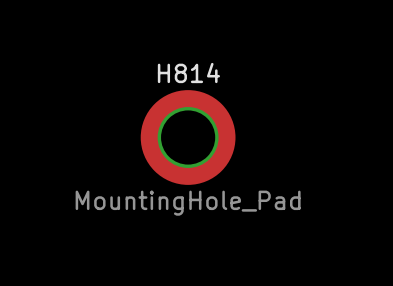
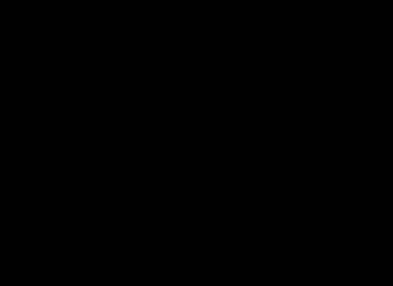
H814: MountingHole_Pad (188, 137) -> none

